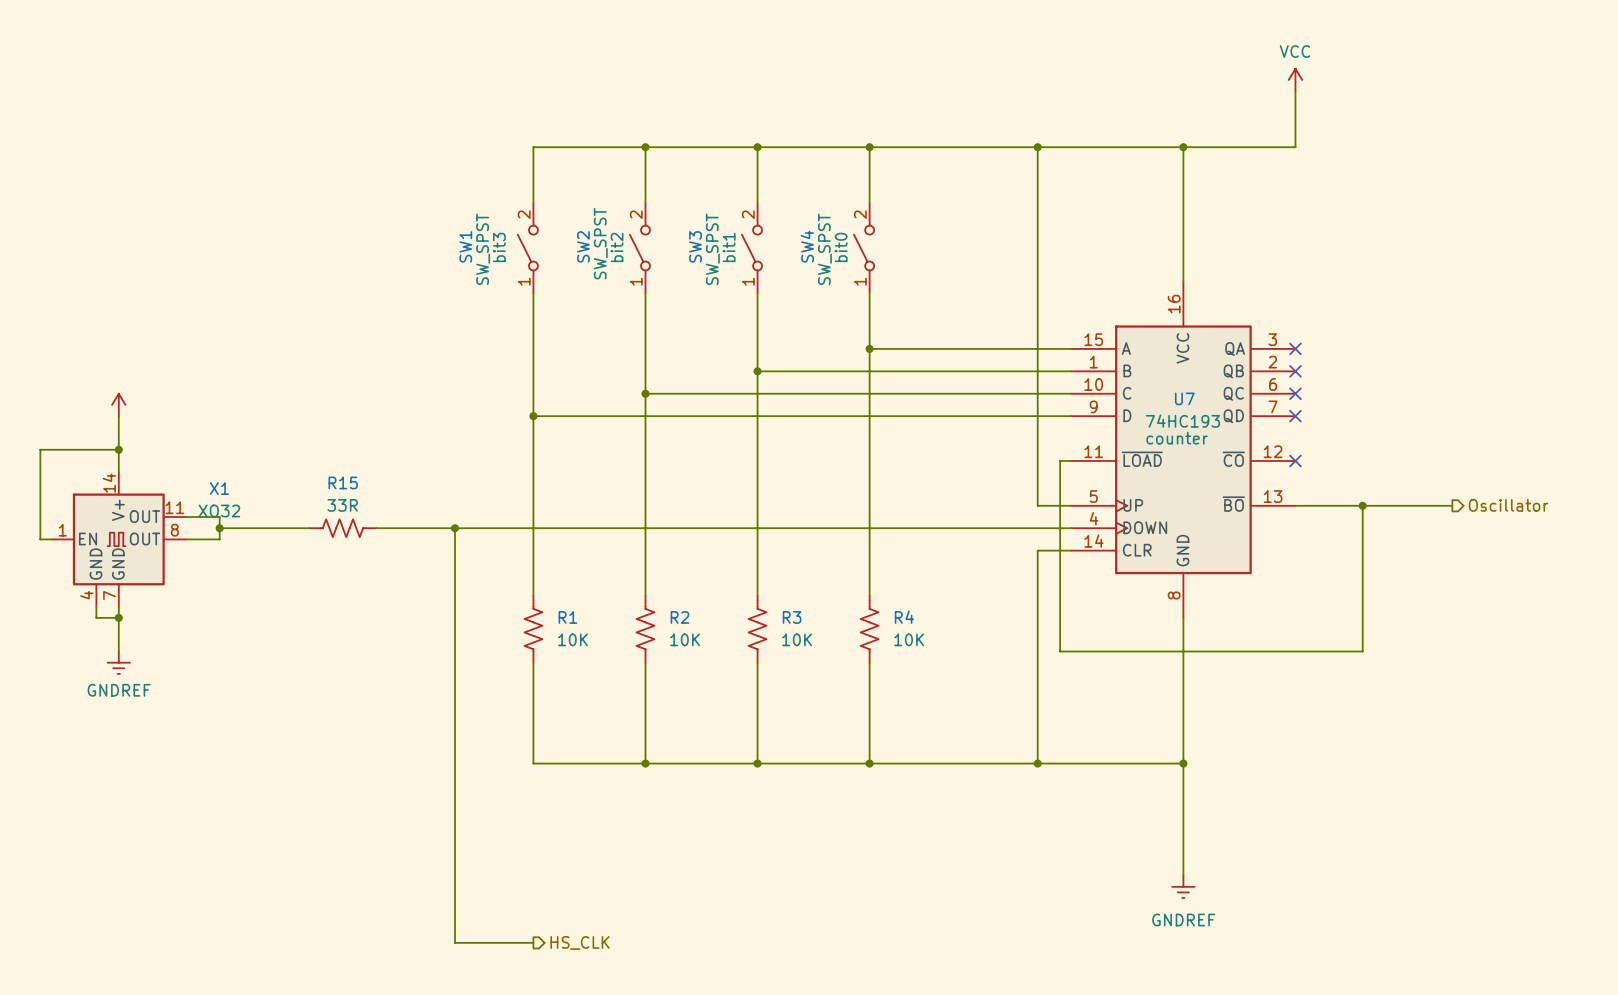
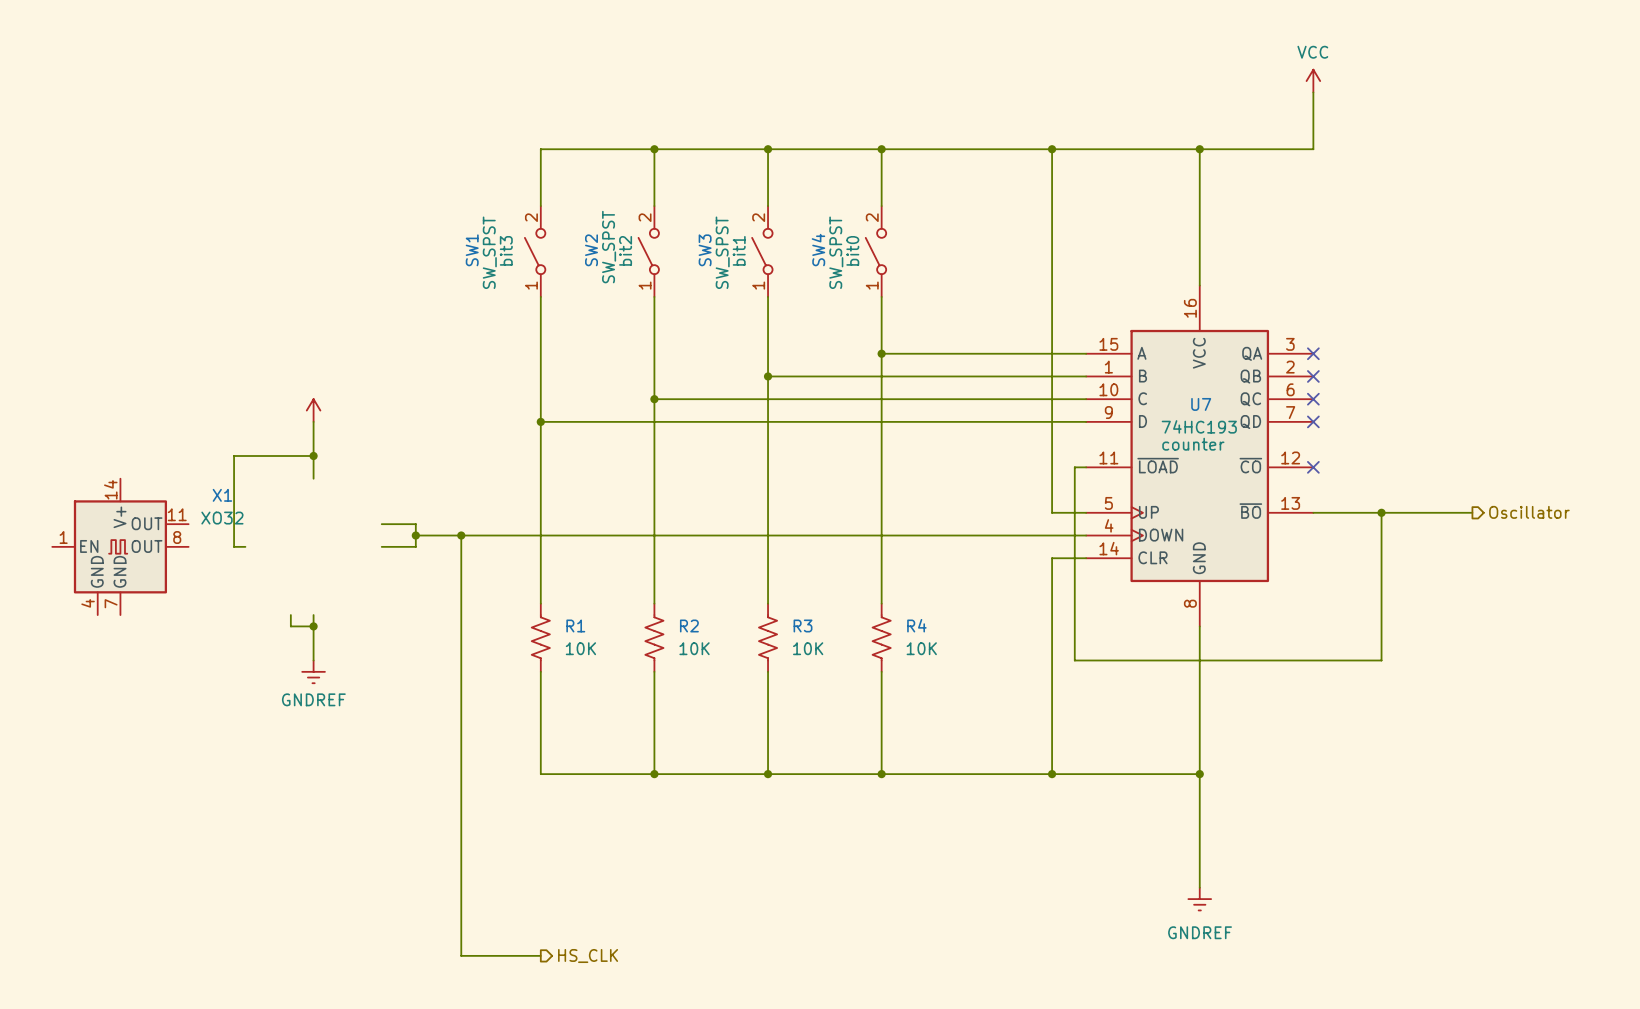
power symbol position: (118, 404) -> (313, 410)
wire: (118, 416) (118, 472) -> (313, 421) (313, 478)
wire: (118, 449) (40, 449) (40, 539) (51, 539) -> (313, 455) (234, 455) (234, 546) (245, 546)
junction: (118, 449) -> none
junction: none -> (313, 455)
wire: (186, 517) (219, 517) (219, 539) (186, 539) -> (381, 524) (415, 524) (415, 546) (381, 546)
wire: (219, 528) (309, 528) -> none
junction: (219, 528) -> none
R15: 33R (342, 528) -> none
wire: (376, 528) (410, 528) -> none
junction: none -> (415, 535)
wire: (96, 606) (96, 617) (118, 617) -> (290, 615) (290, 626) (313, 626)
wire: (118, 606) (118, 651) -> (313, 615) (313, 660)
junction: (118, 617) -> none
junction: none -> (313, 626)
power symbol position: GNDREF (118, 662) -> GNDREF (313, 671)

